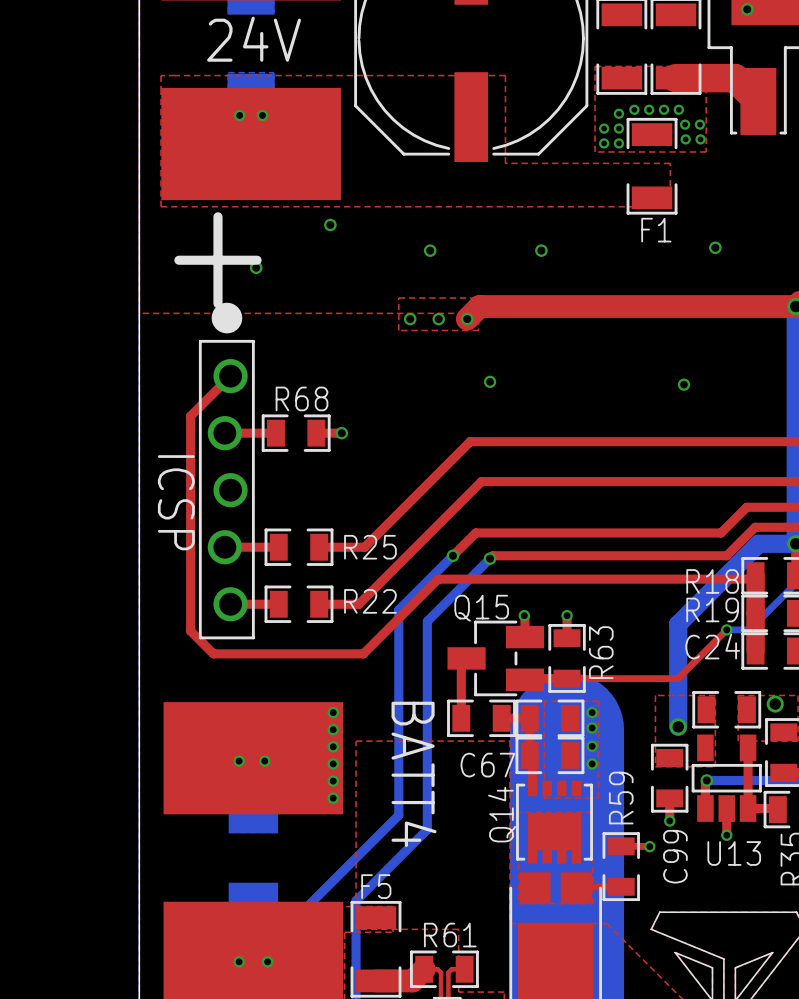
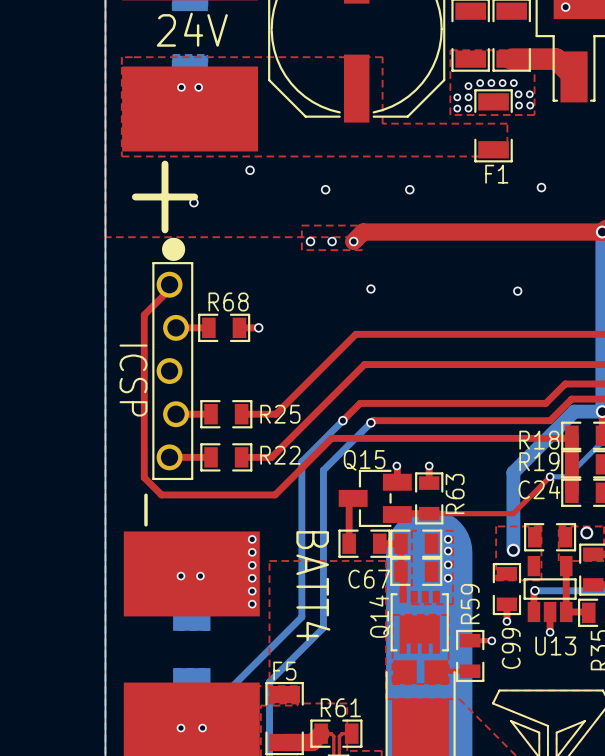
part footprint: [198, 302, 255, 640] -> [152, 237, 194, 481]
text: none -> - (145, 510)

